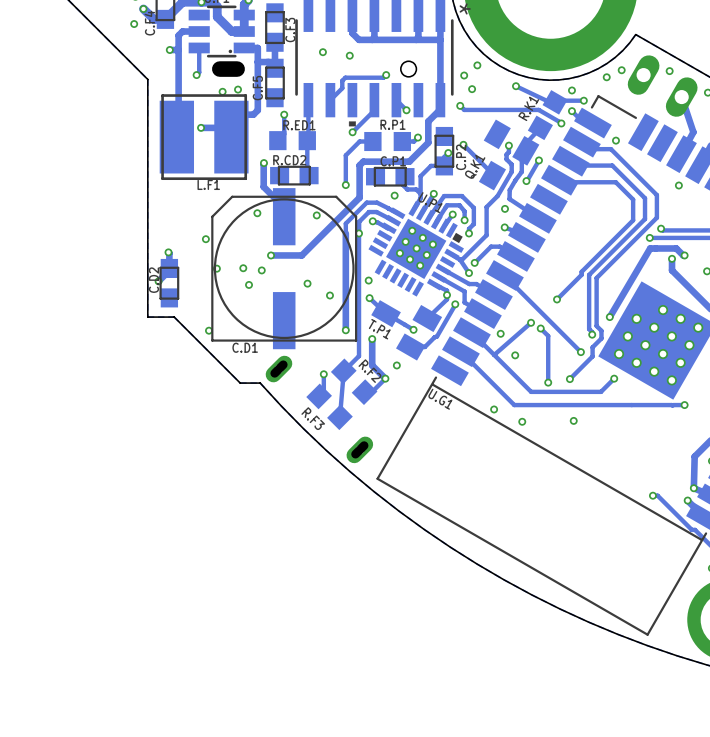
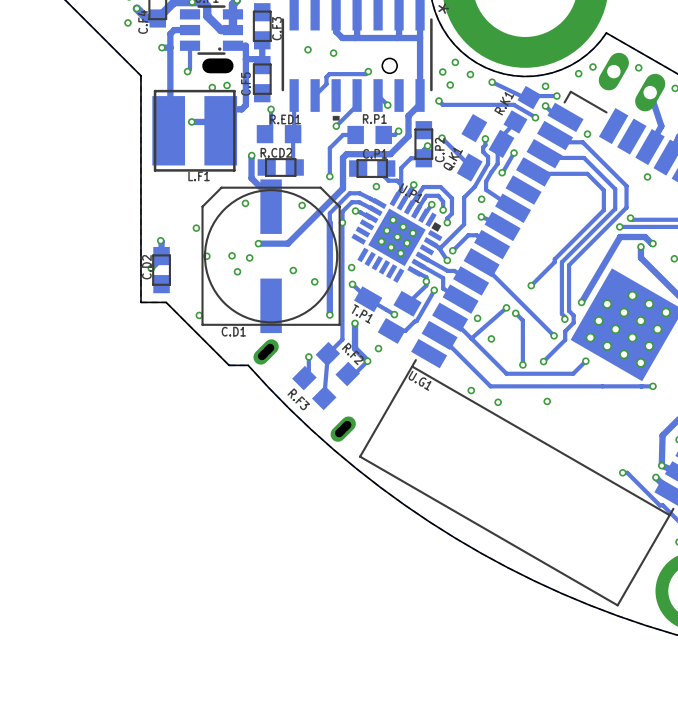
via: none -> (470, 74)

